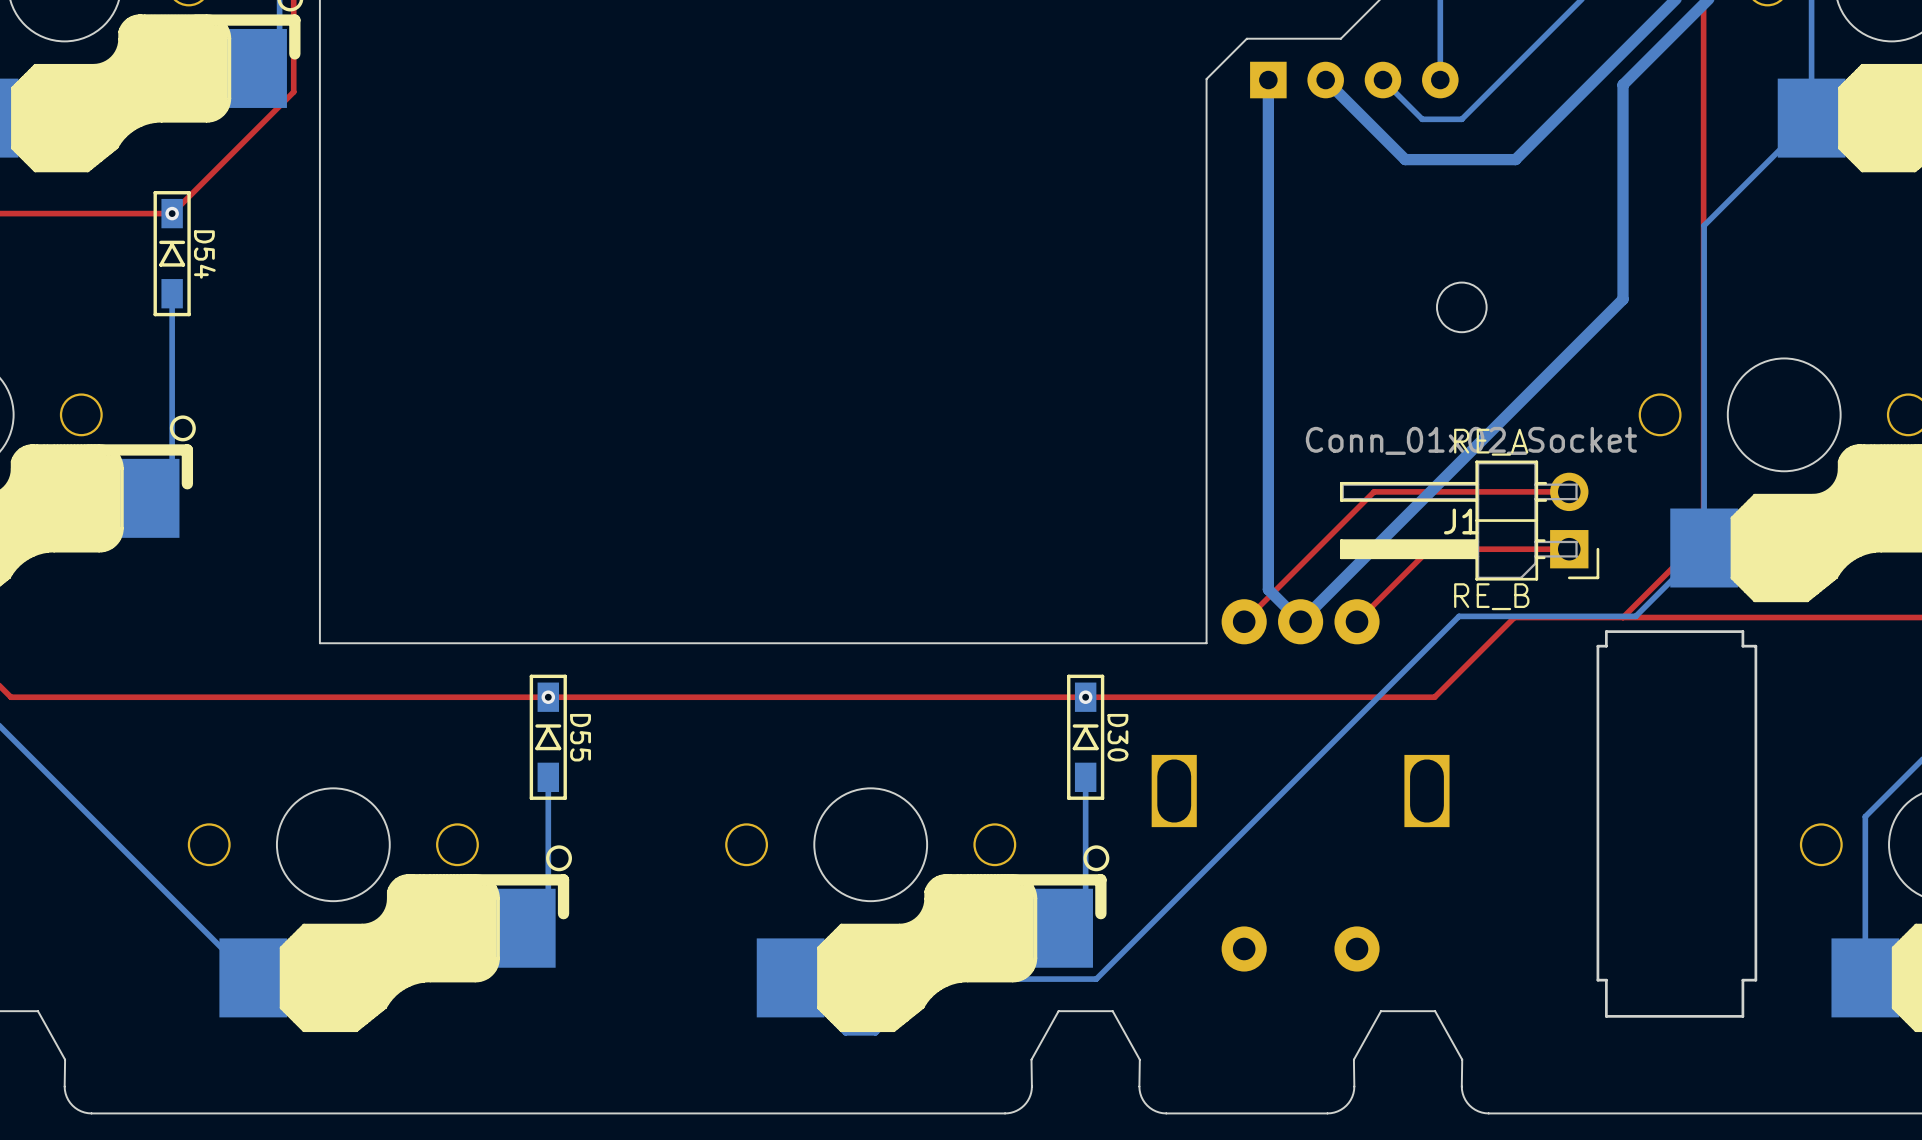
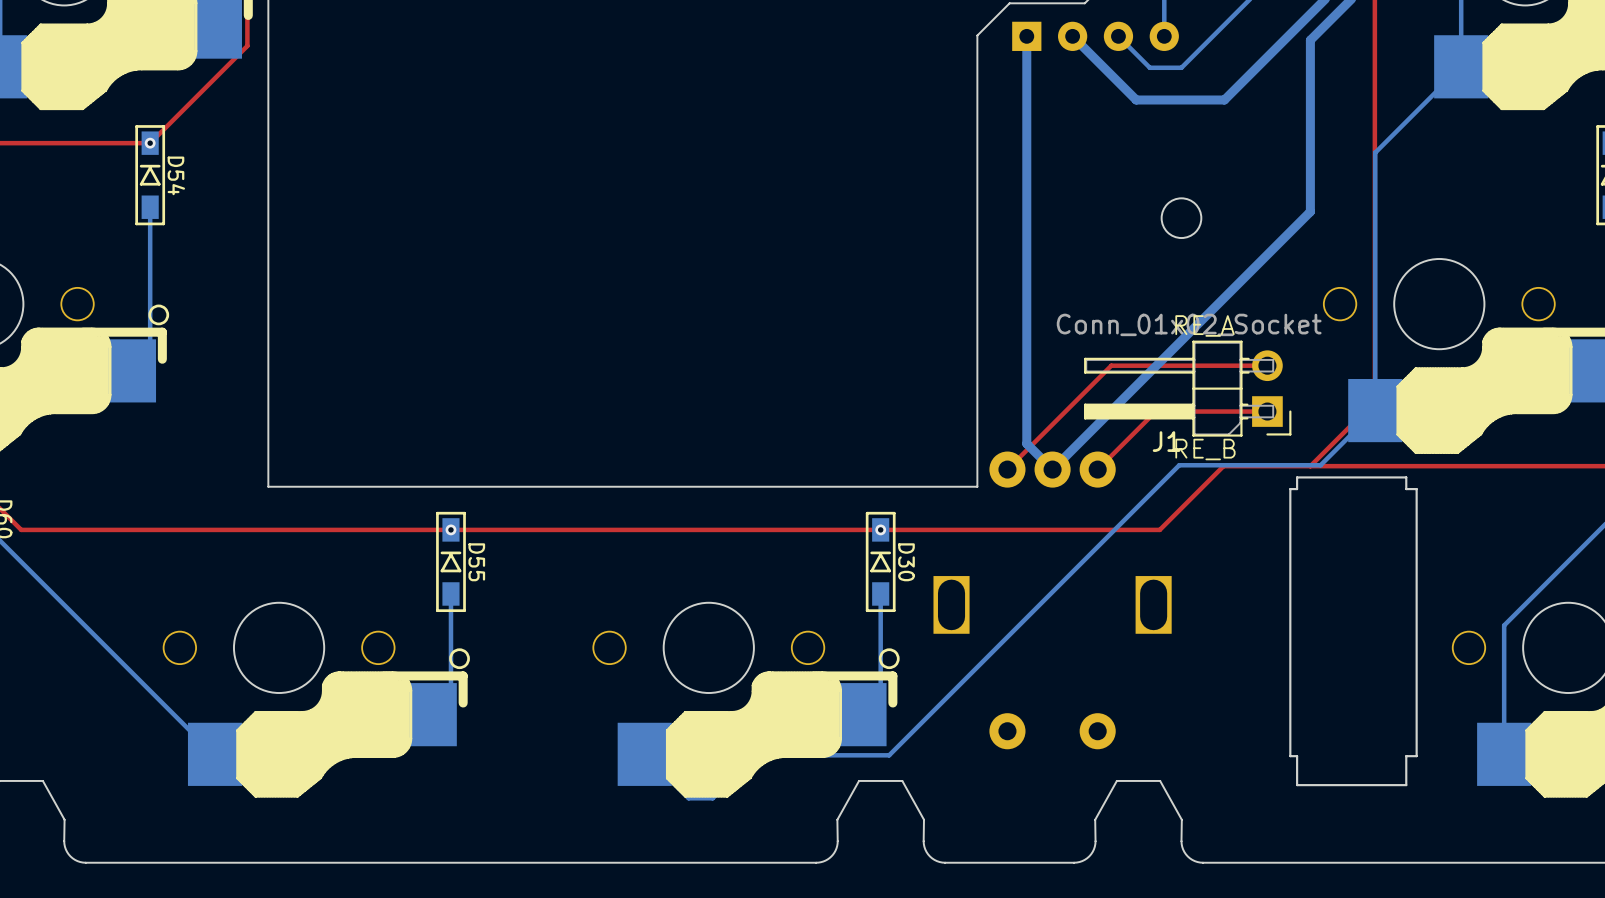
J1 name position: J1 (1461, 521) -> J1 (1166, 441)

